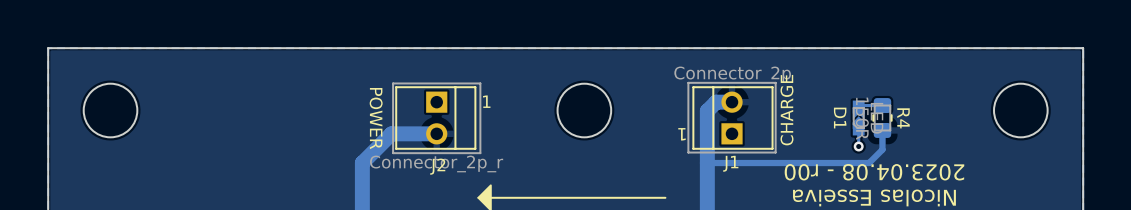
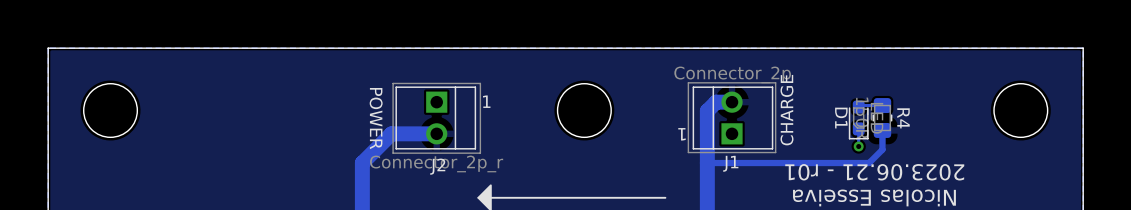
D1 footprint: [852, 100, 865, 136] -> [848, 100, 869, 140]
text: 2023.04.08 - r00 (874, 172) -> 2023.06.21 - r01 (874, 172)

